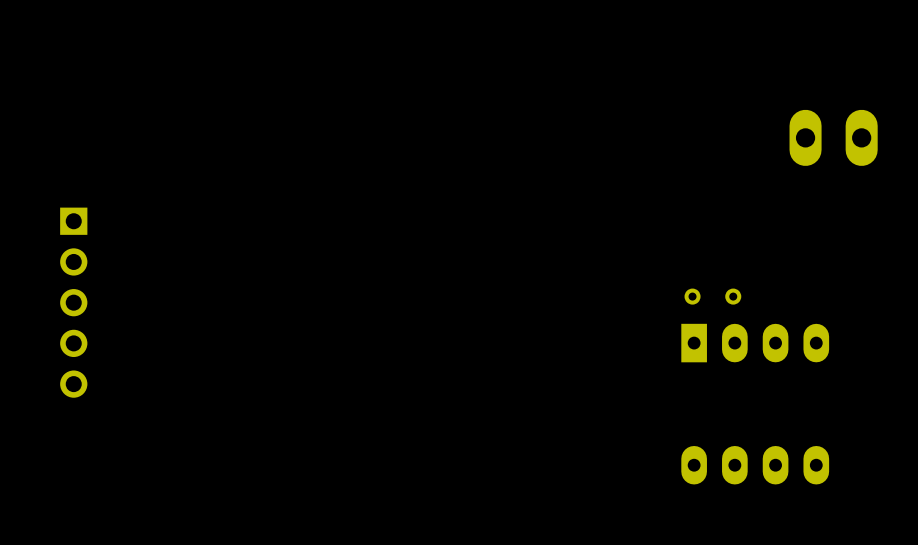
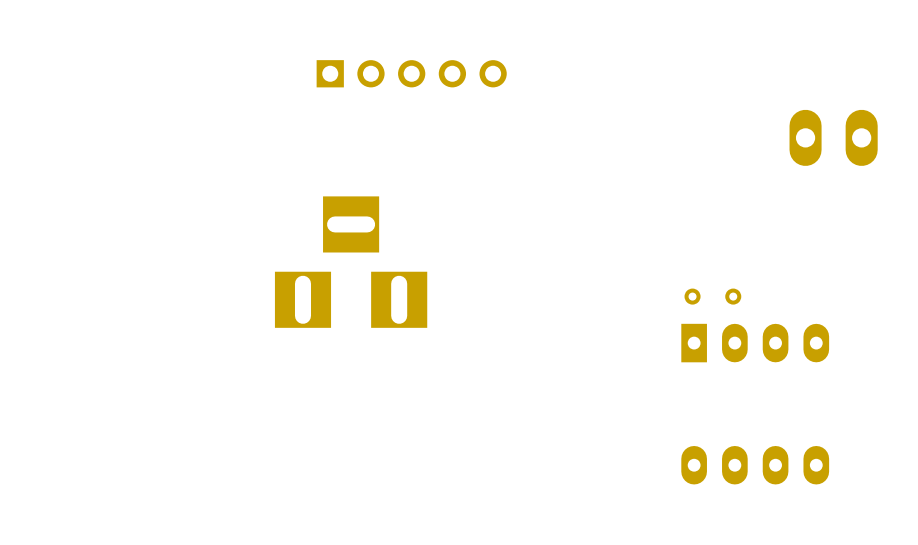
part: none -> (411, 73)
part: none -> (351, 262)
part: (73, 302) -> none

